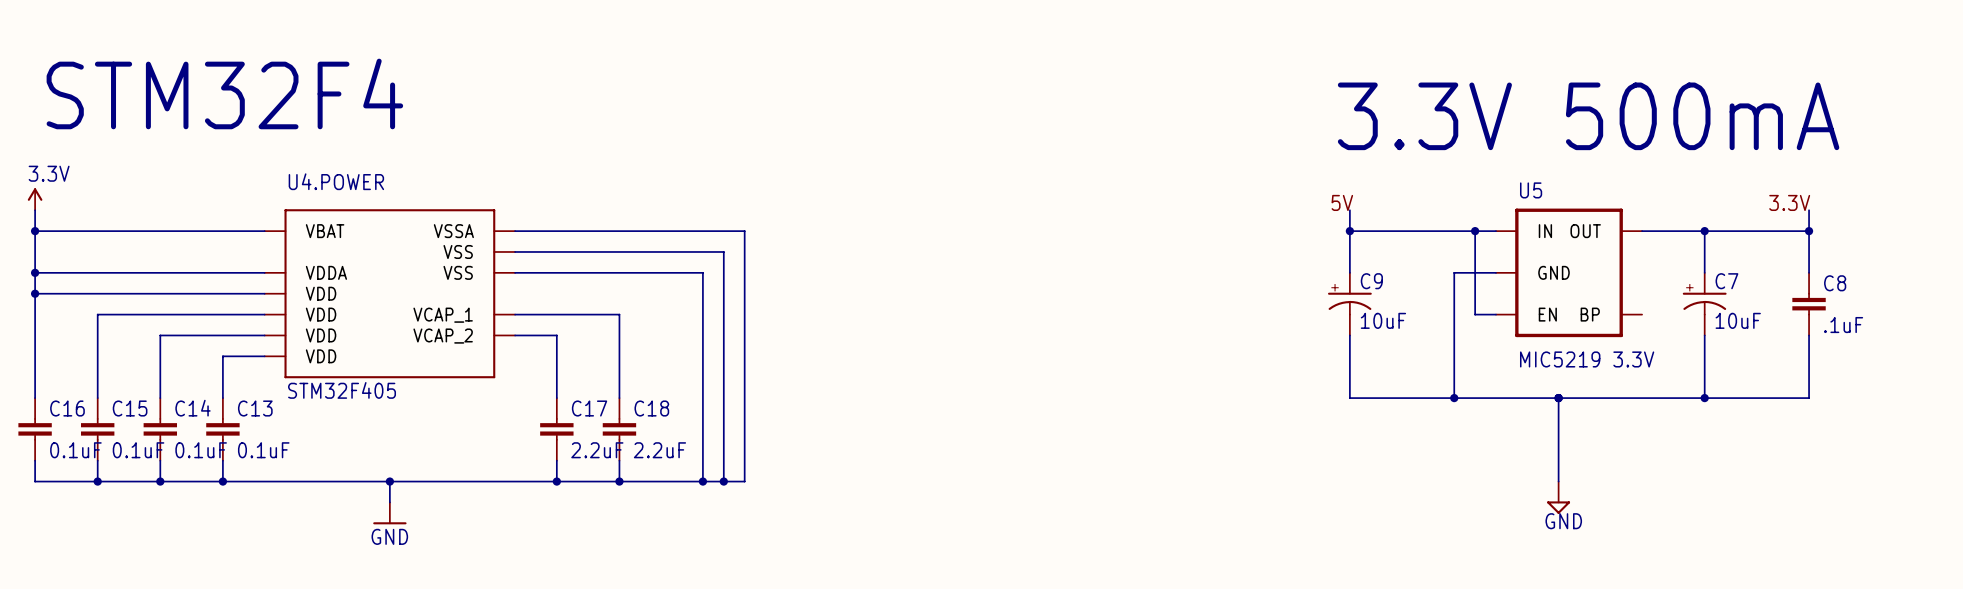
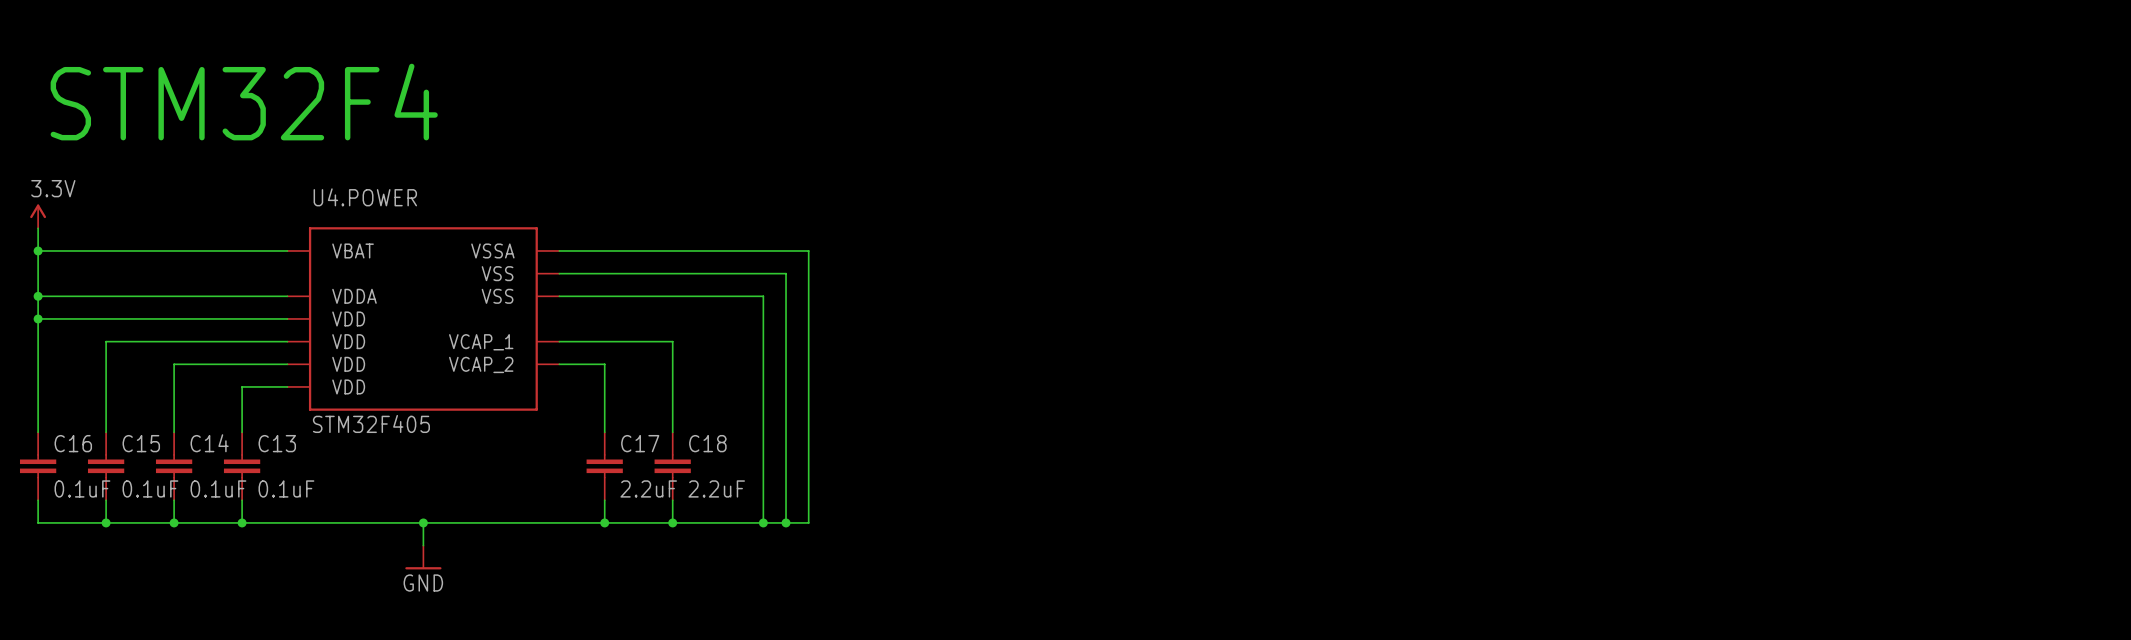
text: 3.3V 500mA (1588, 116) -> none
label: 5V (1342, 202) -> none
label: 3.3V (1789, 202) -> none
wire: (1349, 210) (1349, 272) -> none
wire: (1809, 210) (1809, 272) -> none
wire: (1349, 231) (1495, 231) -> none
junction: (1349, 231) -> none
wire: (1475, 231) (1475, 314) (1495, 314) -> none
junction: (1475, 231) -> none
wire: (1642, 231) (1809, 231) -> none
wire: (1704, 231) (1704, 272) -> none
junction: (1704, 231) -> none
junction: (1809, 231) -> none
wire: (1495, 272) (1454, 272) (1454, 398) -> none
U5: MIC5219 3.3V (1569, 272) -> none
C9: 10uF (1349, 304) -> none
C7: 10uF (1704, 304) -> none
C8: .1uF (1809, 304) -> none
wire: (1349, 335) (1349, 398) (1809, 398) (1809, 335) -> none
wire: (1704, 335) (1704, 398) -> none
junction: (1454, 398) -> none
wire: (1558, 398) (1558, 481) -> none
junction: (1558, 398) -> none
junction: (1704, 398) -> none
power symbol: GND (1558, 497) -> none

